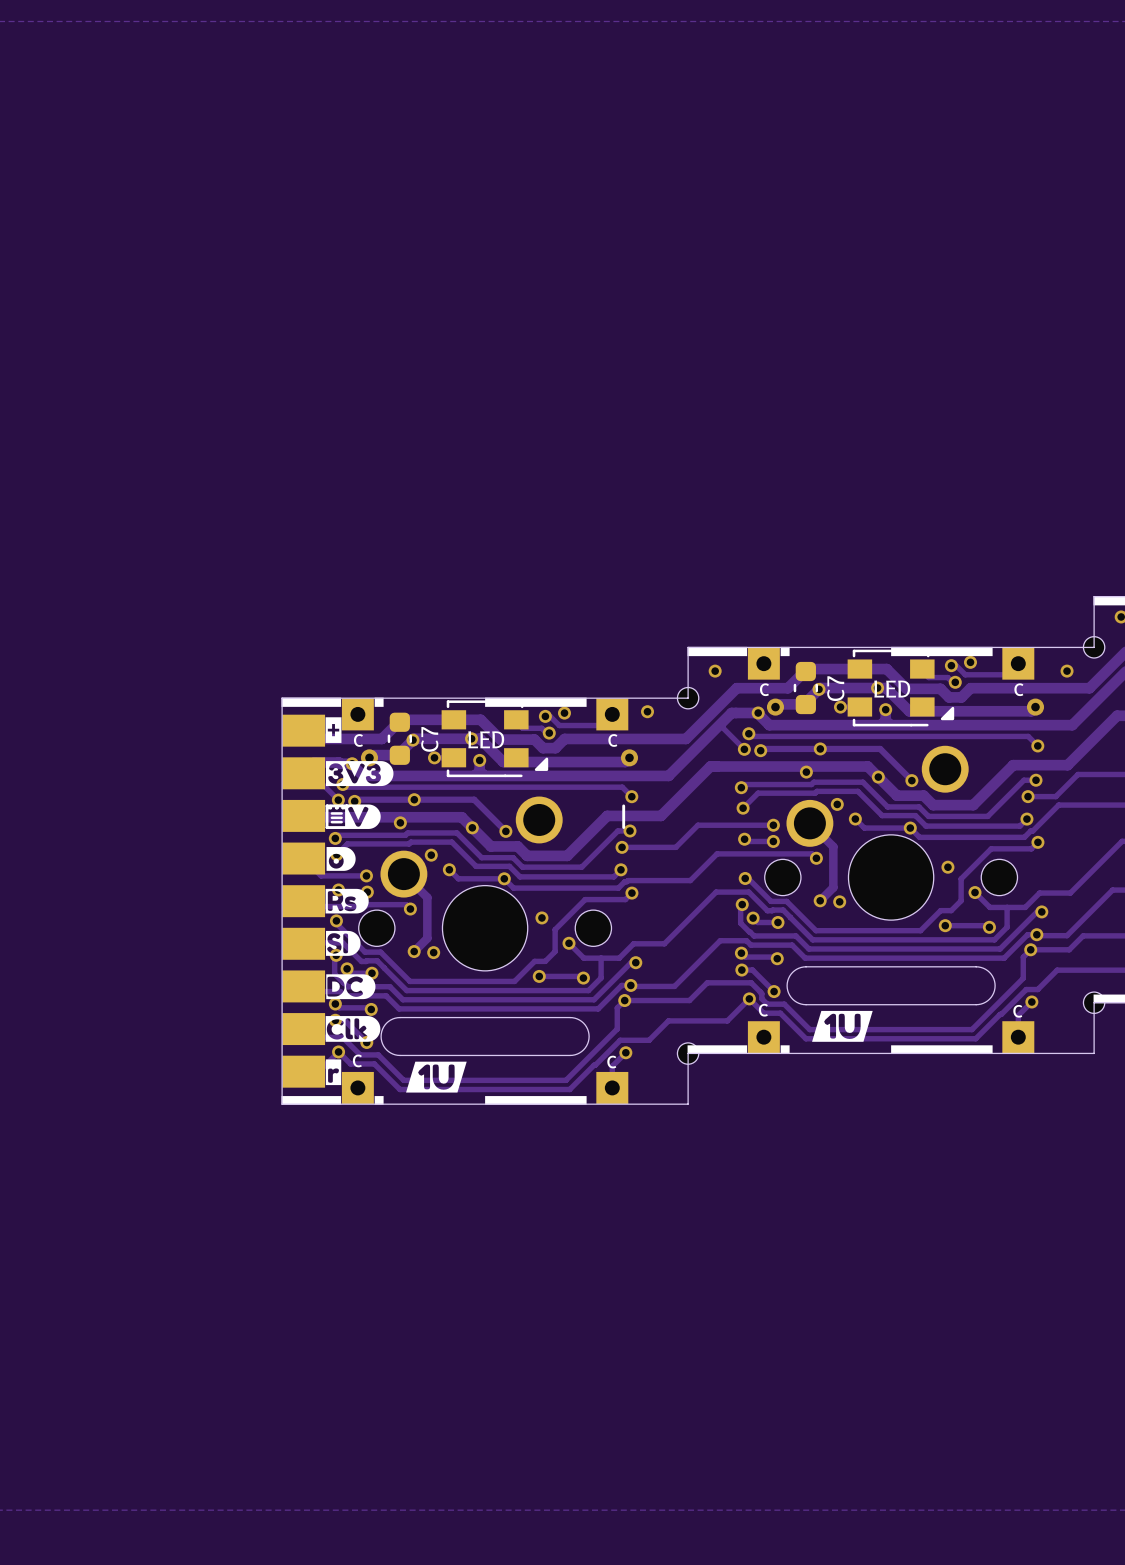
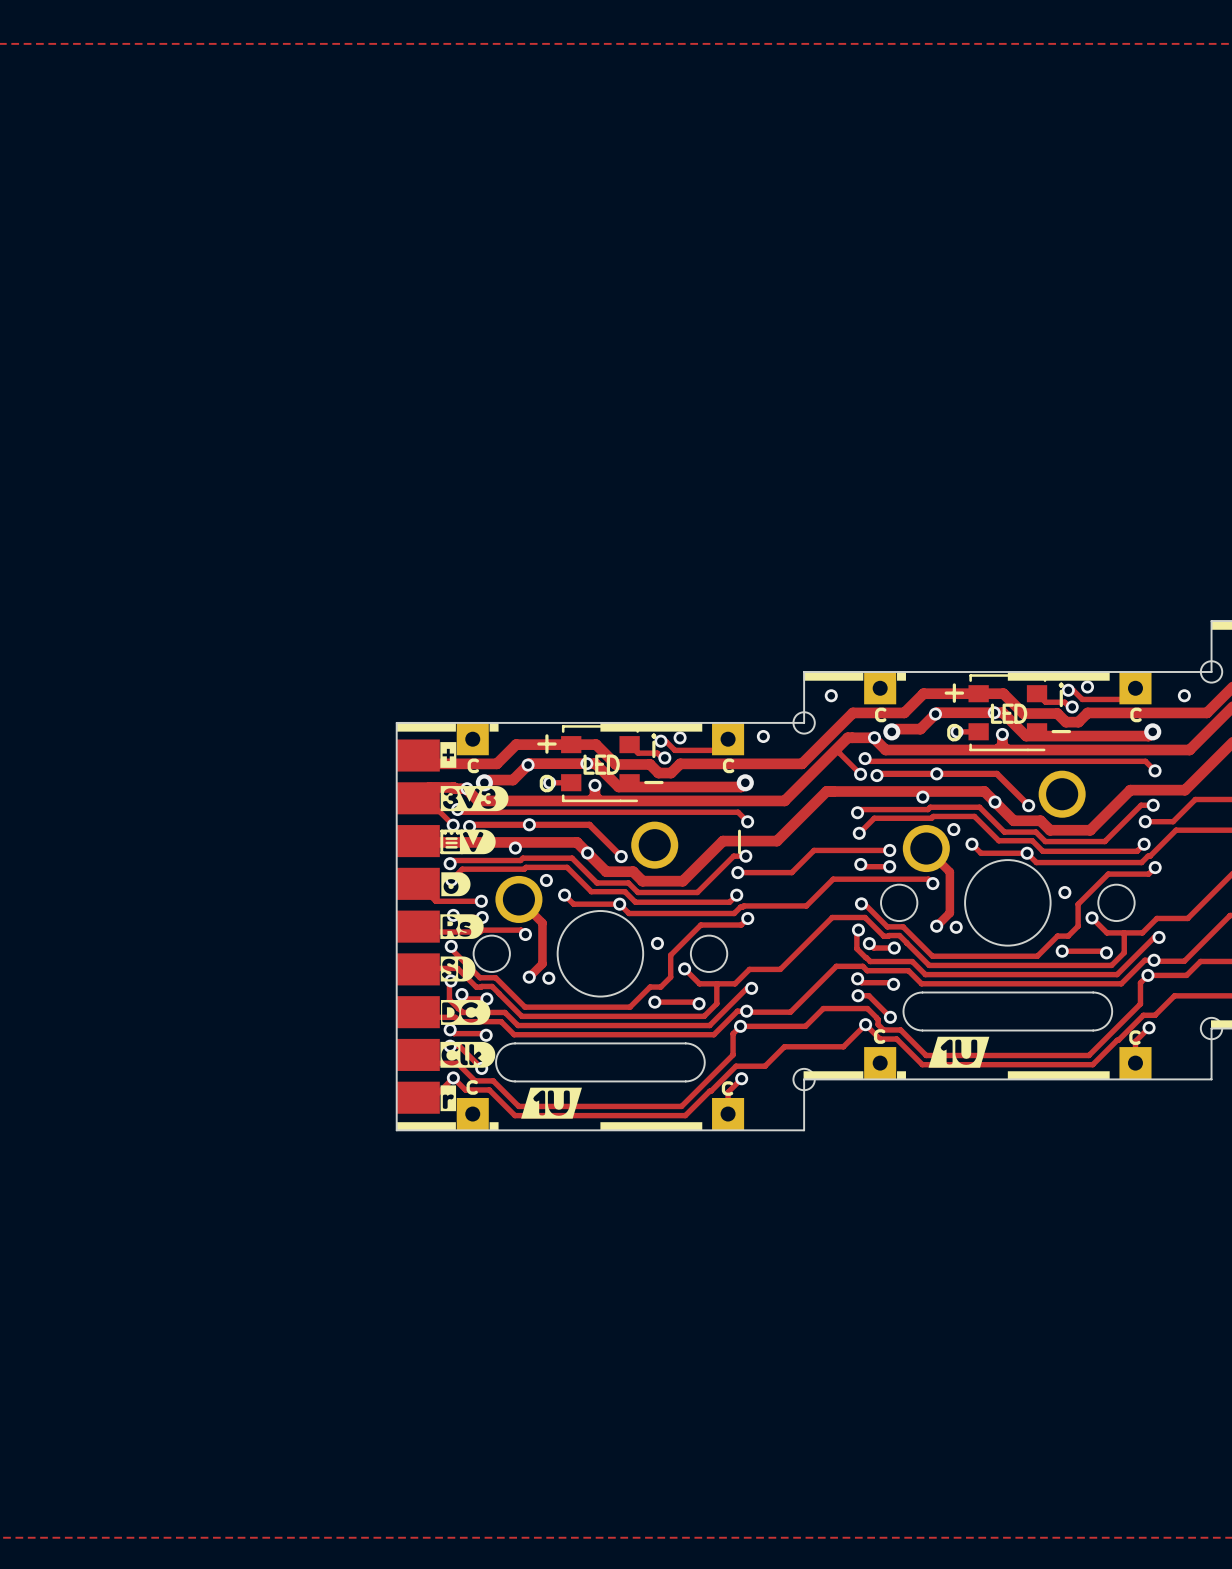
part footprint: [847, 649, 955, 727] -> [968, 674, 1048, 752]
C7: (805, 688) -> none
part footprint: [441, 700, 549, 778] -> [561, 725, 640, 803]
C7: (399, 738) -> none

